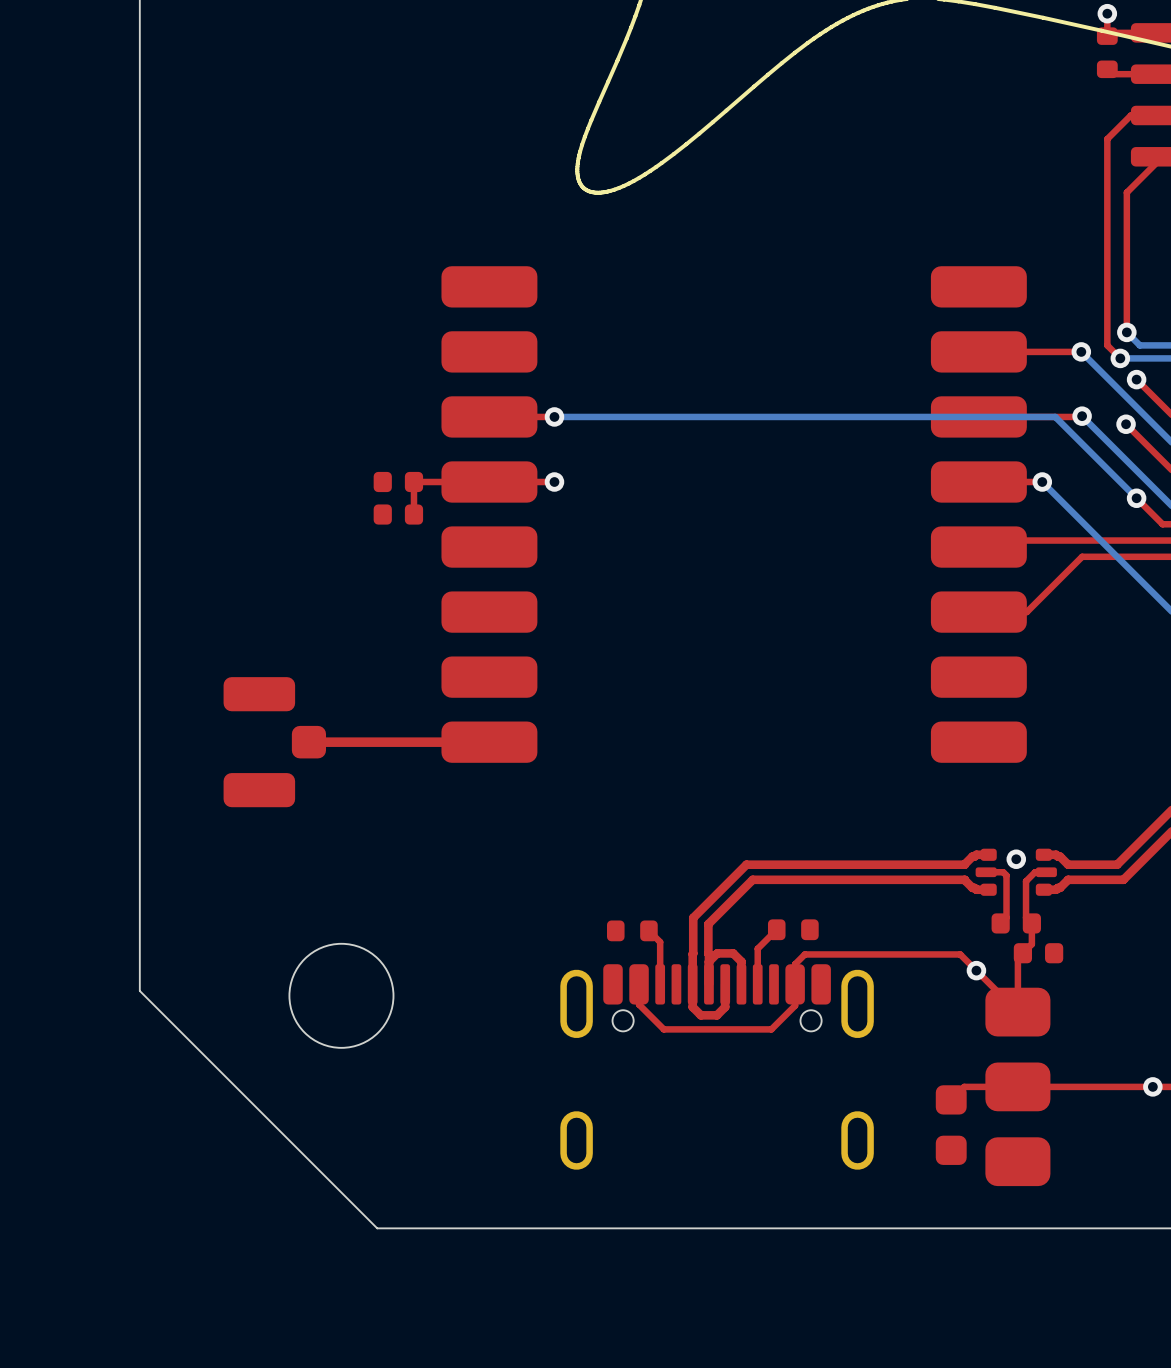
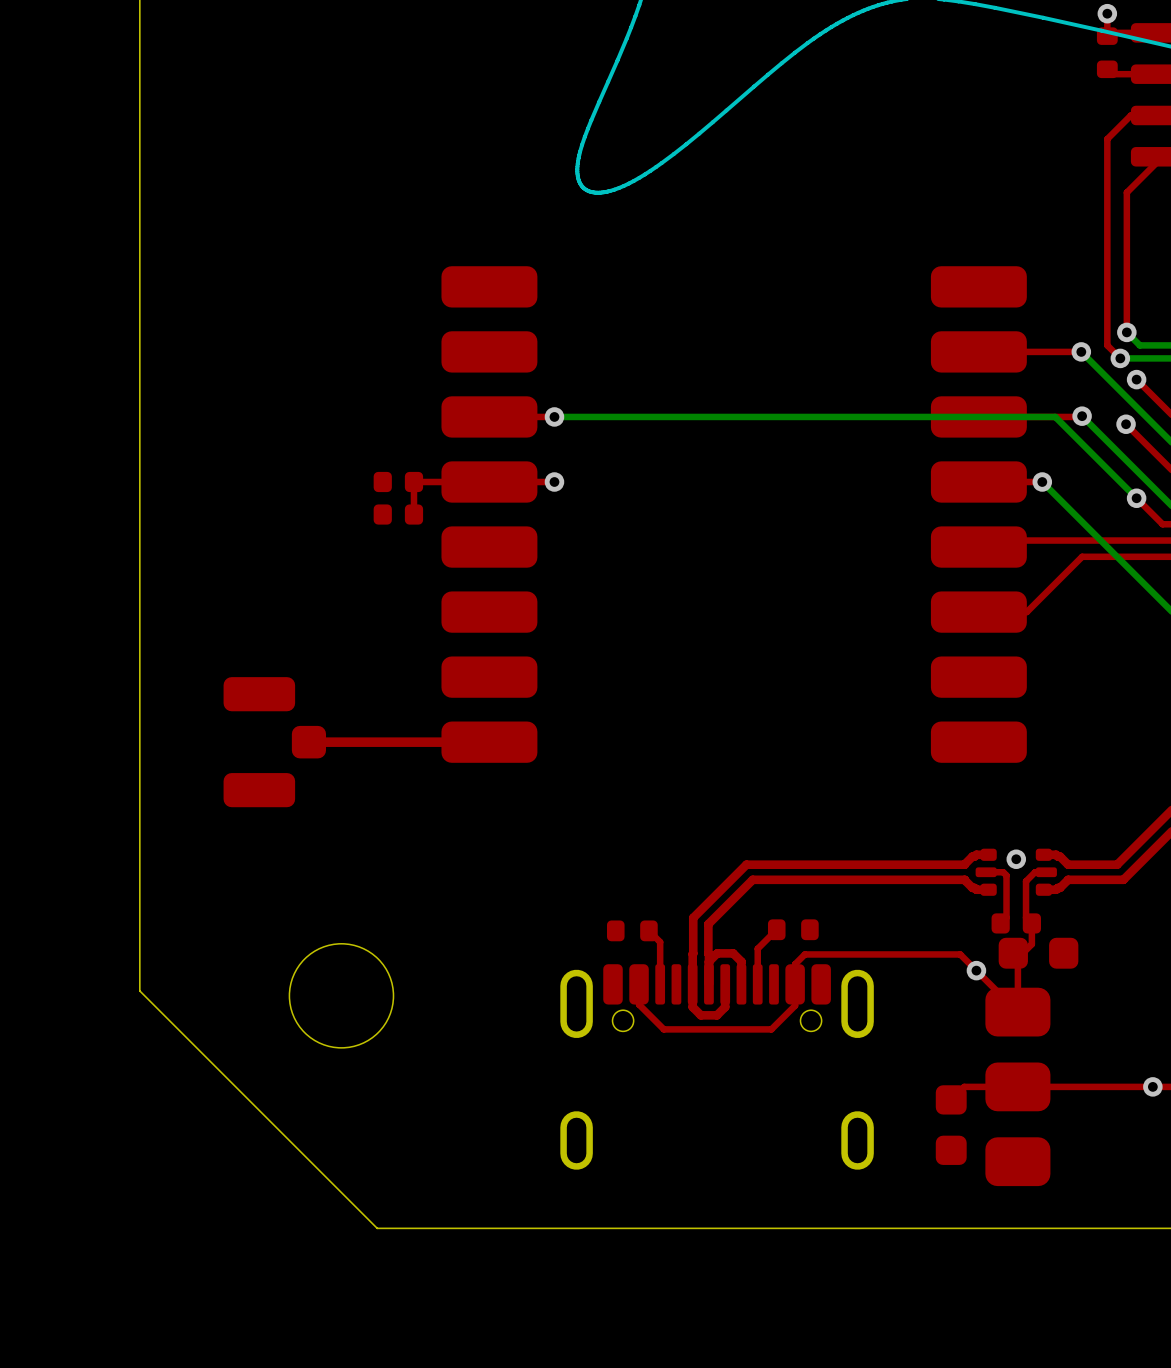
part footprint: [1013, 943, 1064, 964] -> [998, 937, 1079, 969]

